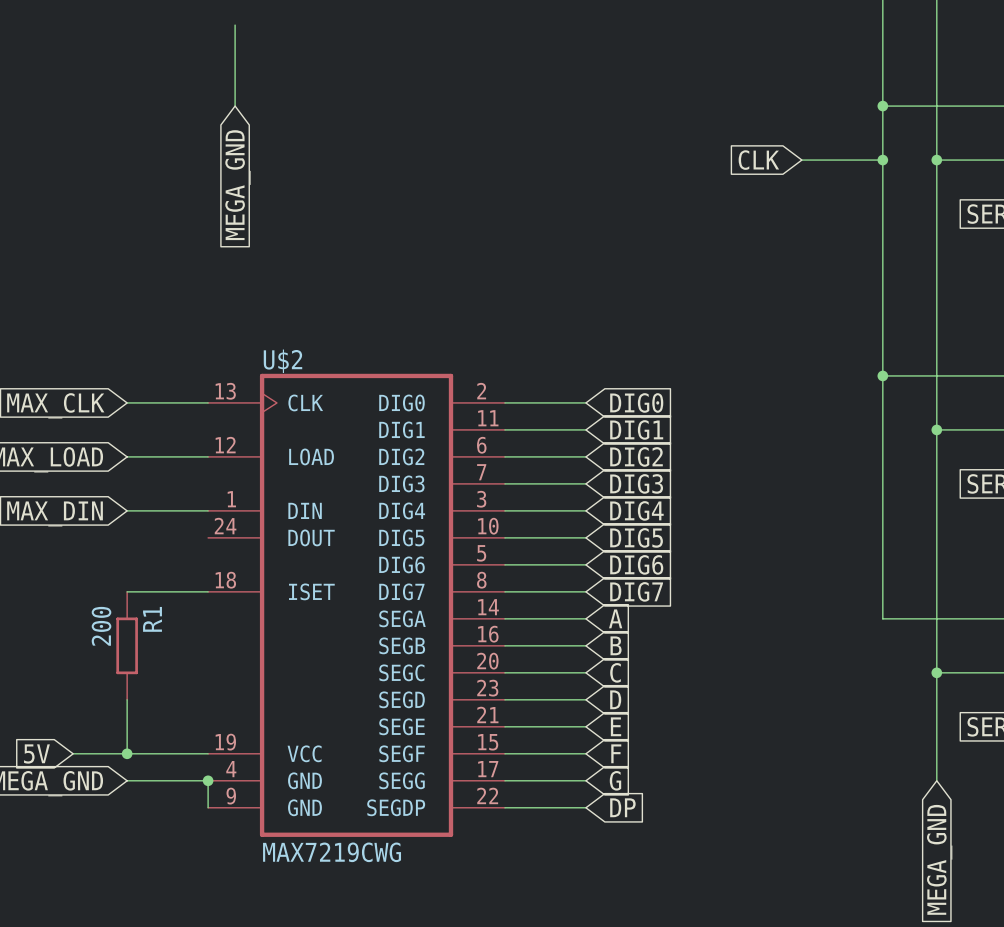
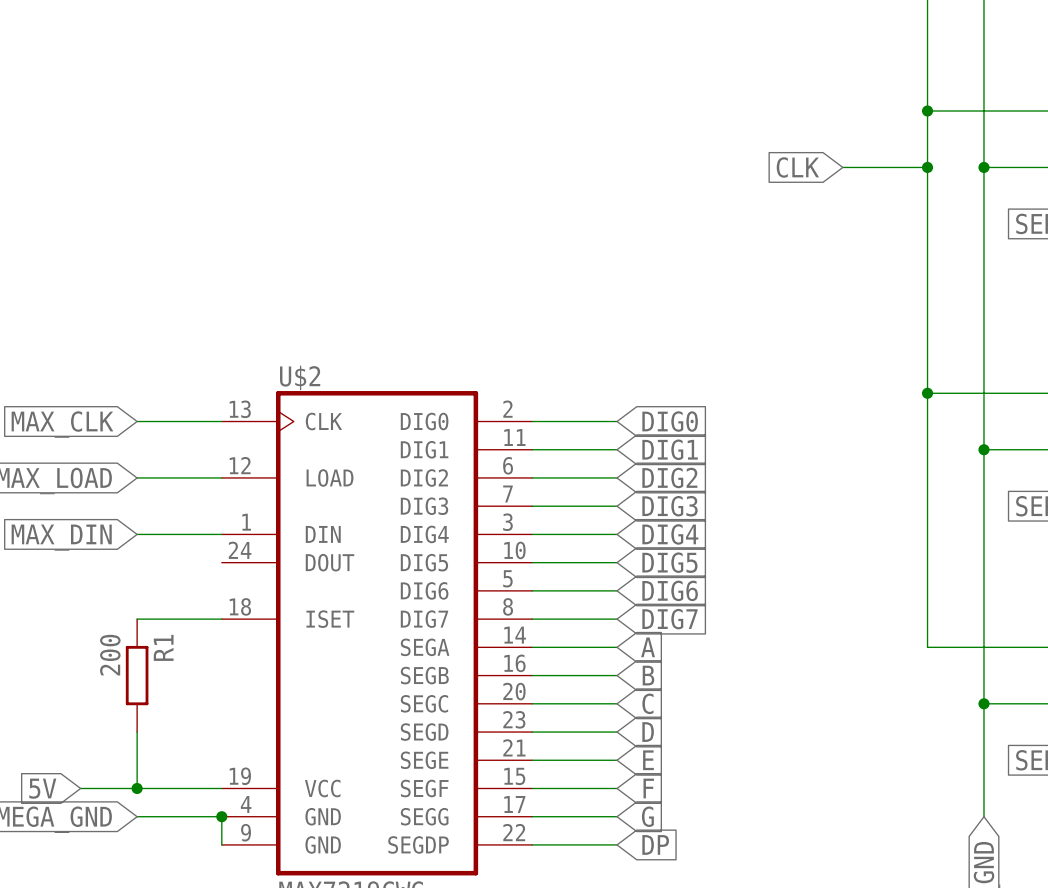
wire: (235, 25) (235, 106) -> none
global label: MEGA_GND (237, 185) -> none

